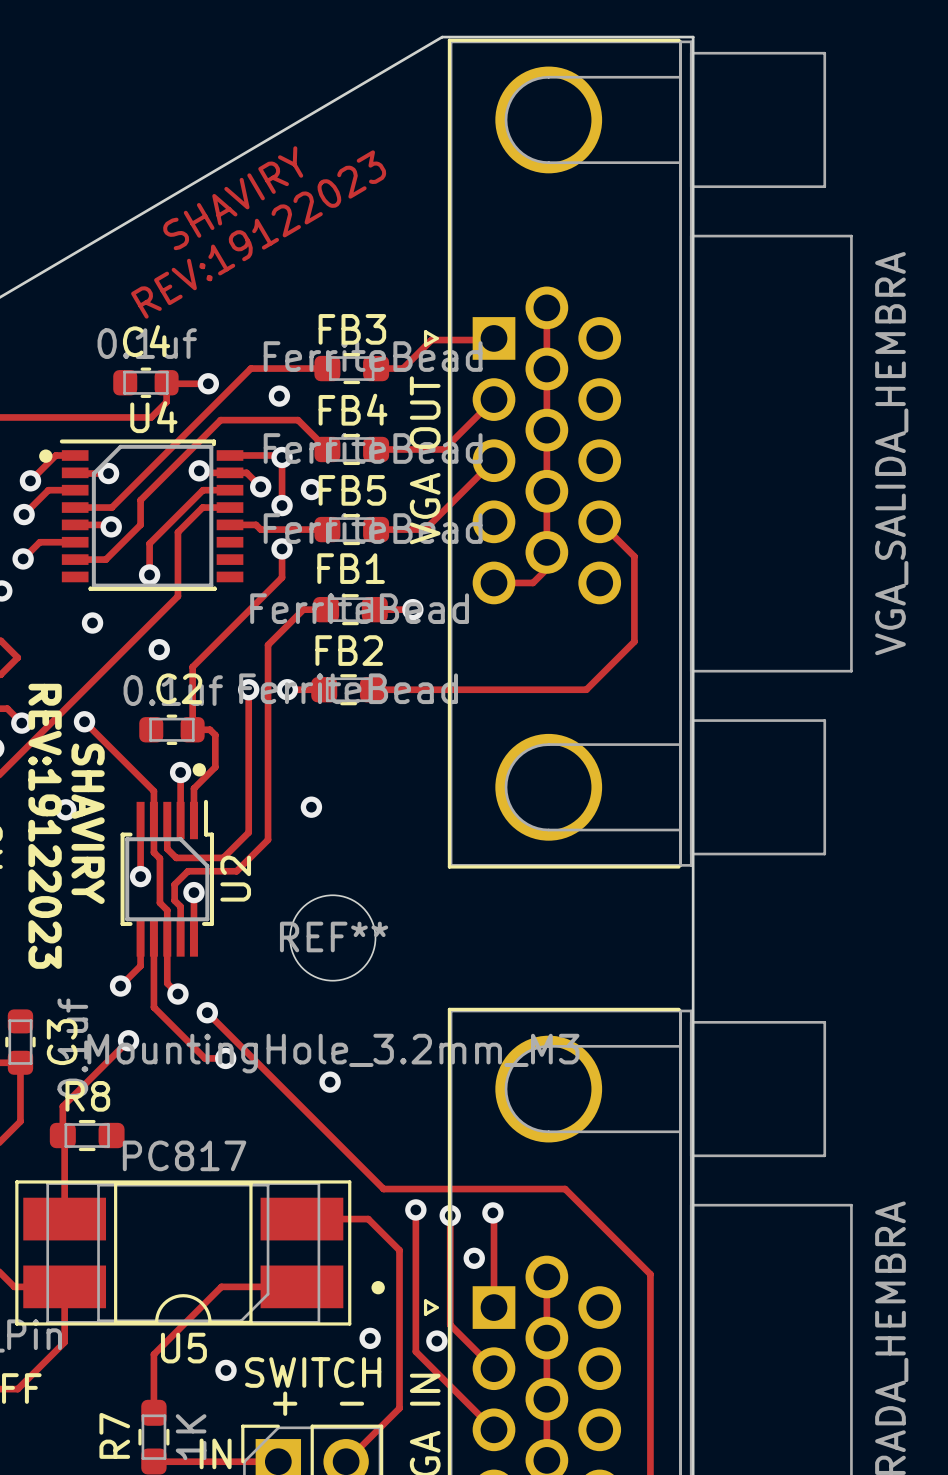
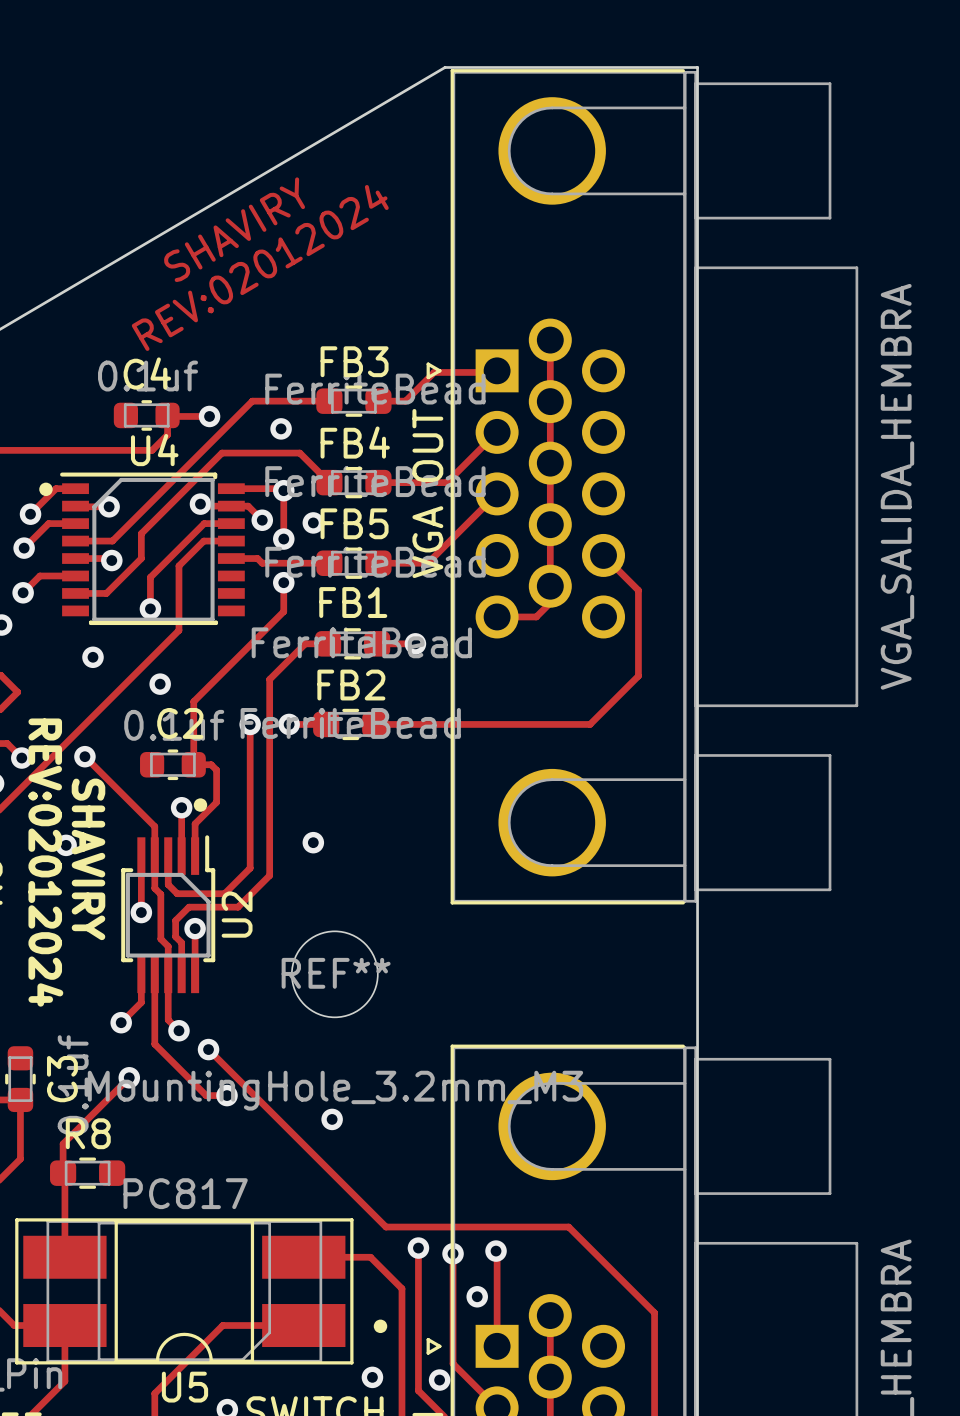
text: REV:19122023 (258, 234) -> REV:02012024 (260, 267)
text: REV:19122023 (45, 826) -> REV:02012024 (45, 862)

